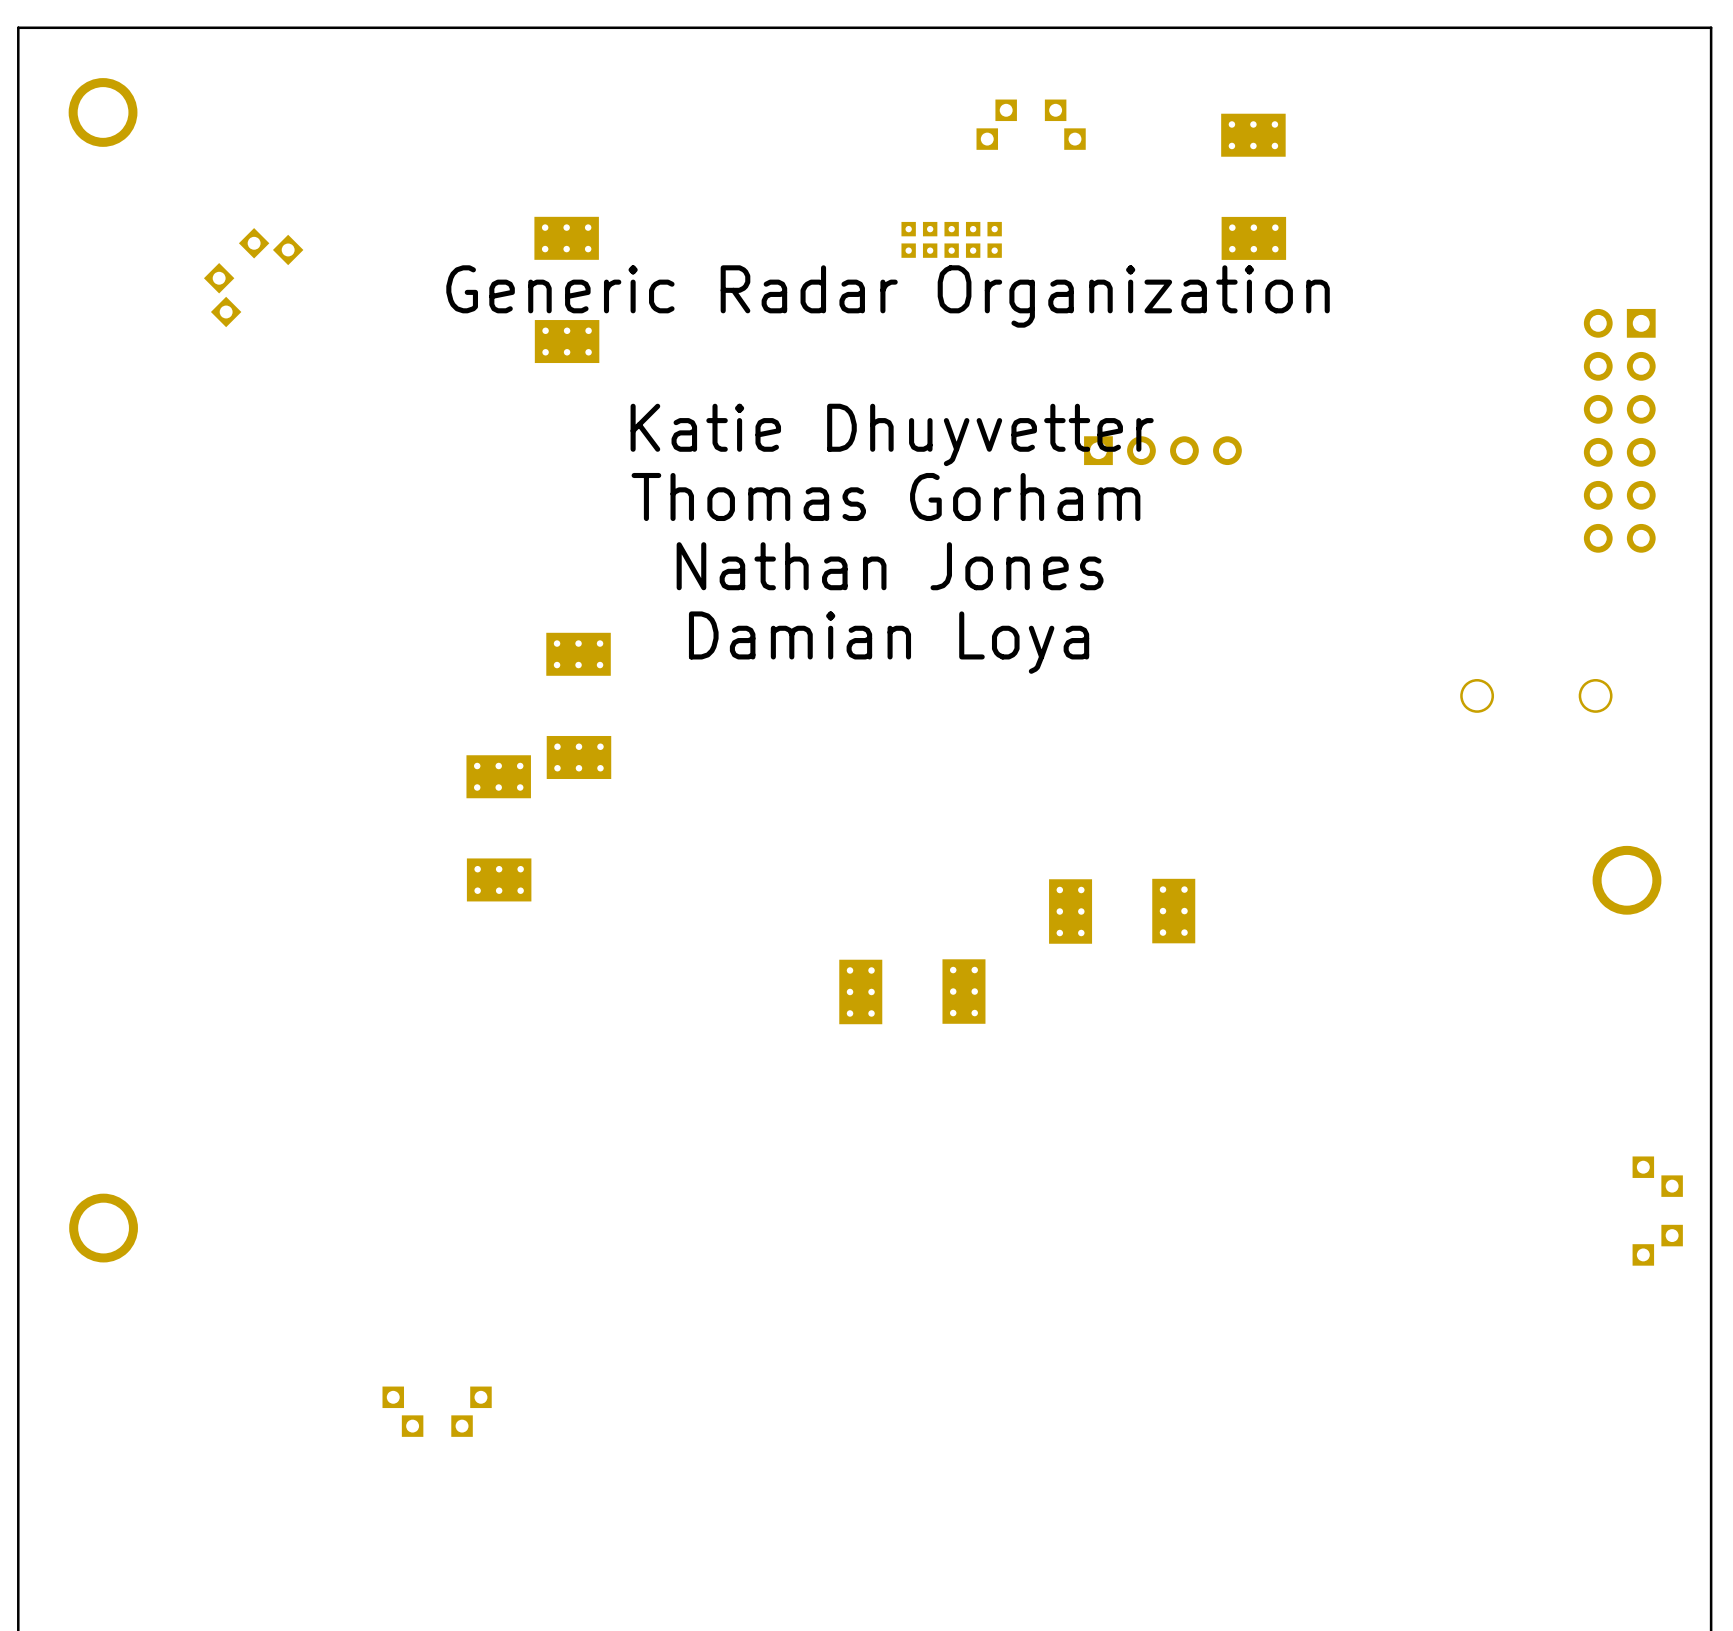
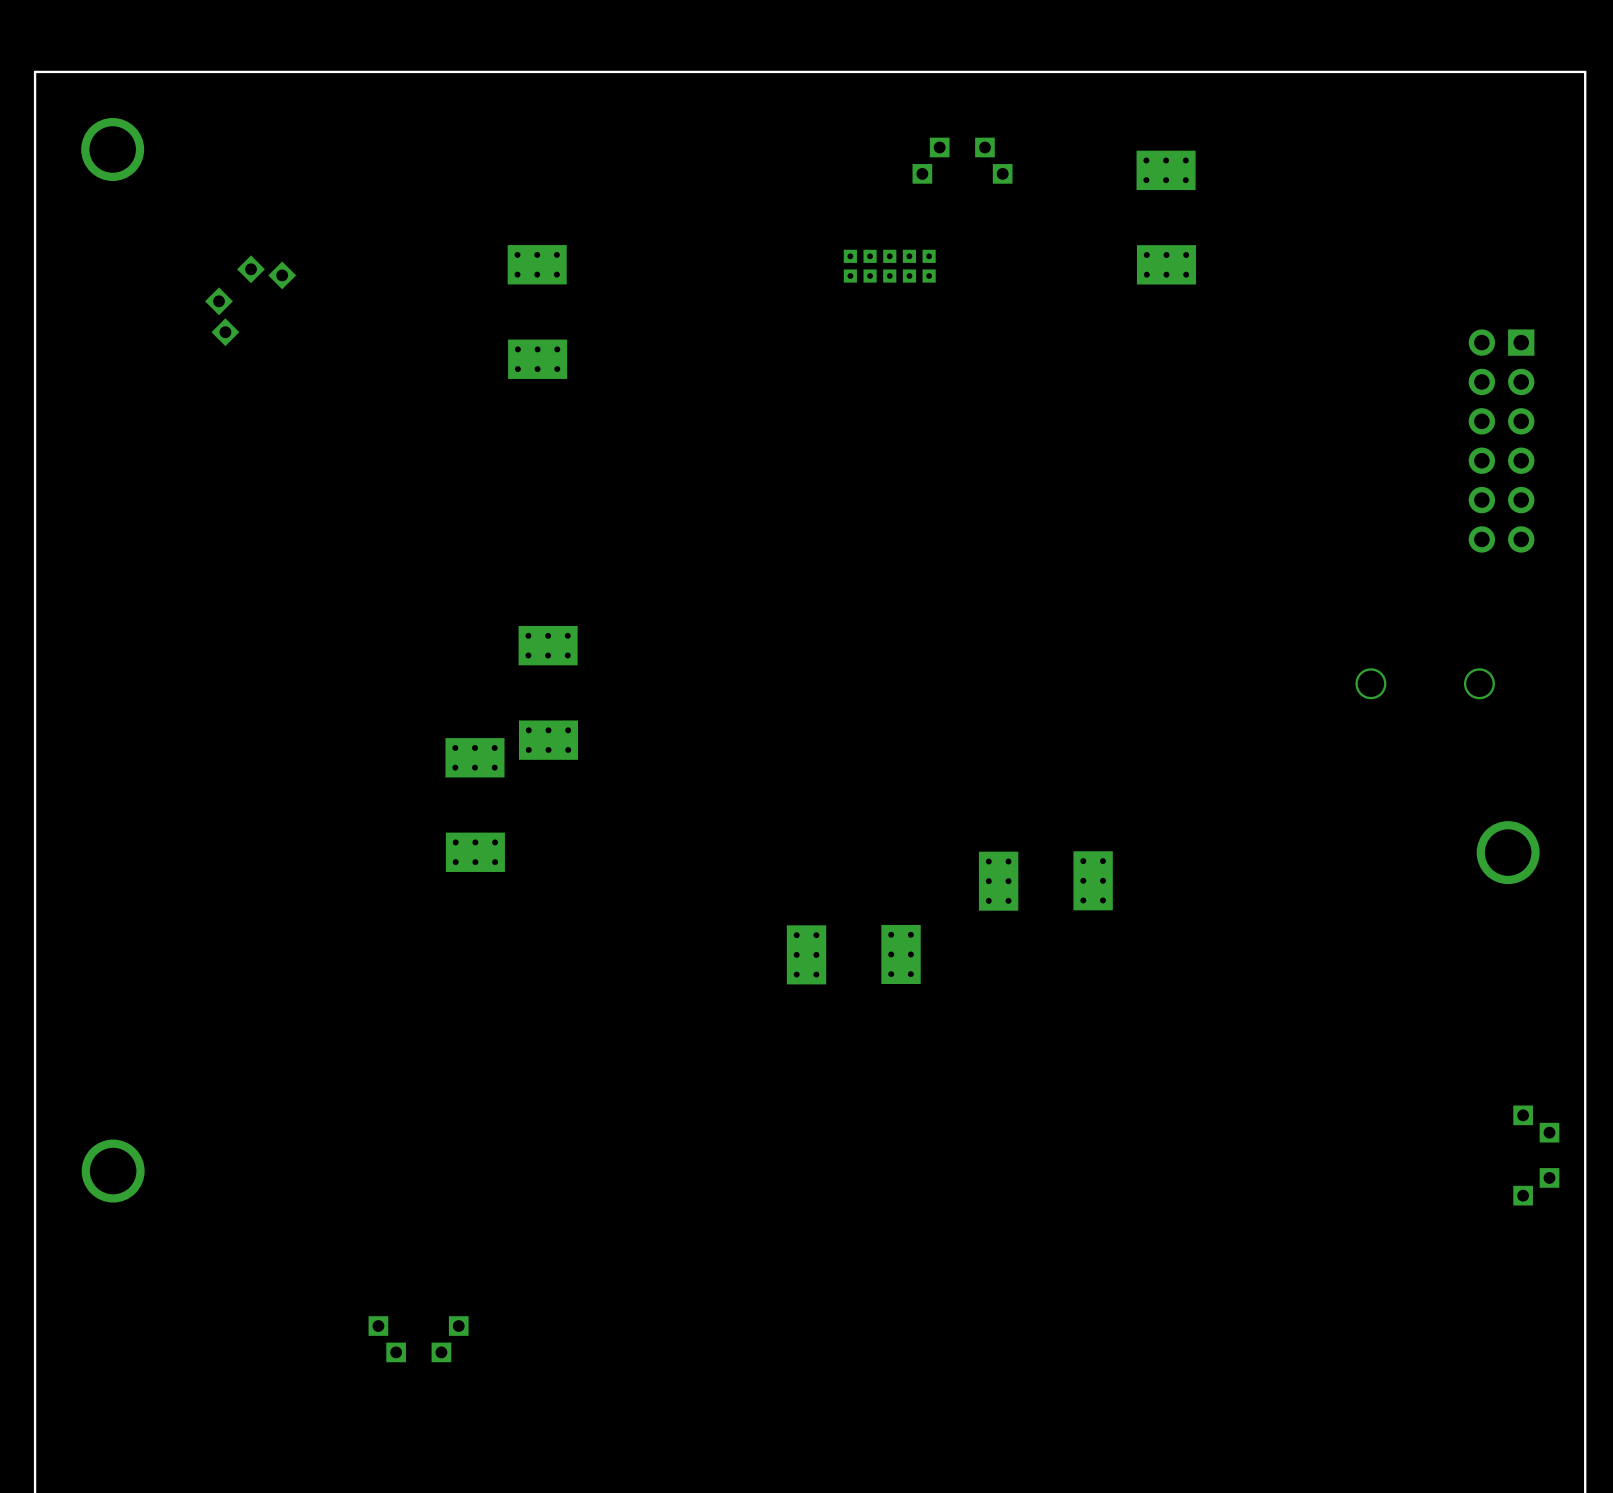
text: Generic Radar Organization (888, 296) -> none
text: Katie Dhuyvetter (892, 434) -> none
part: (1162, 450) -> none
text: Thomas Gorham (885, 496) -> none
text: Nathan Jones (890, 566) -> none
text: Damian Loya (889, 642) -> none

